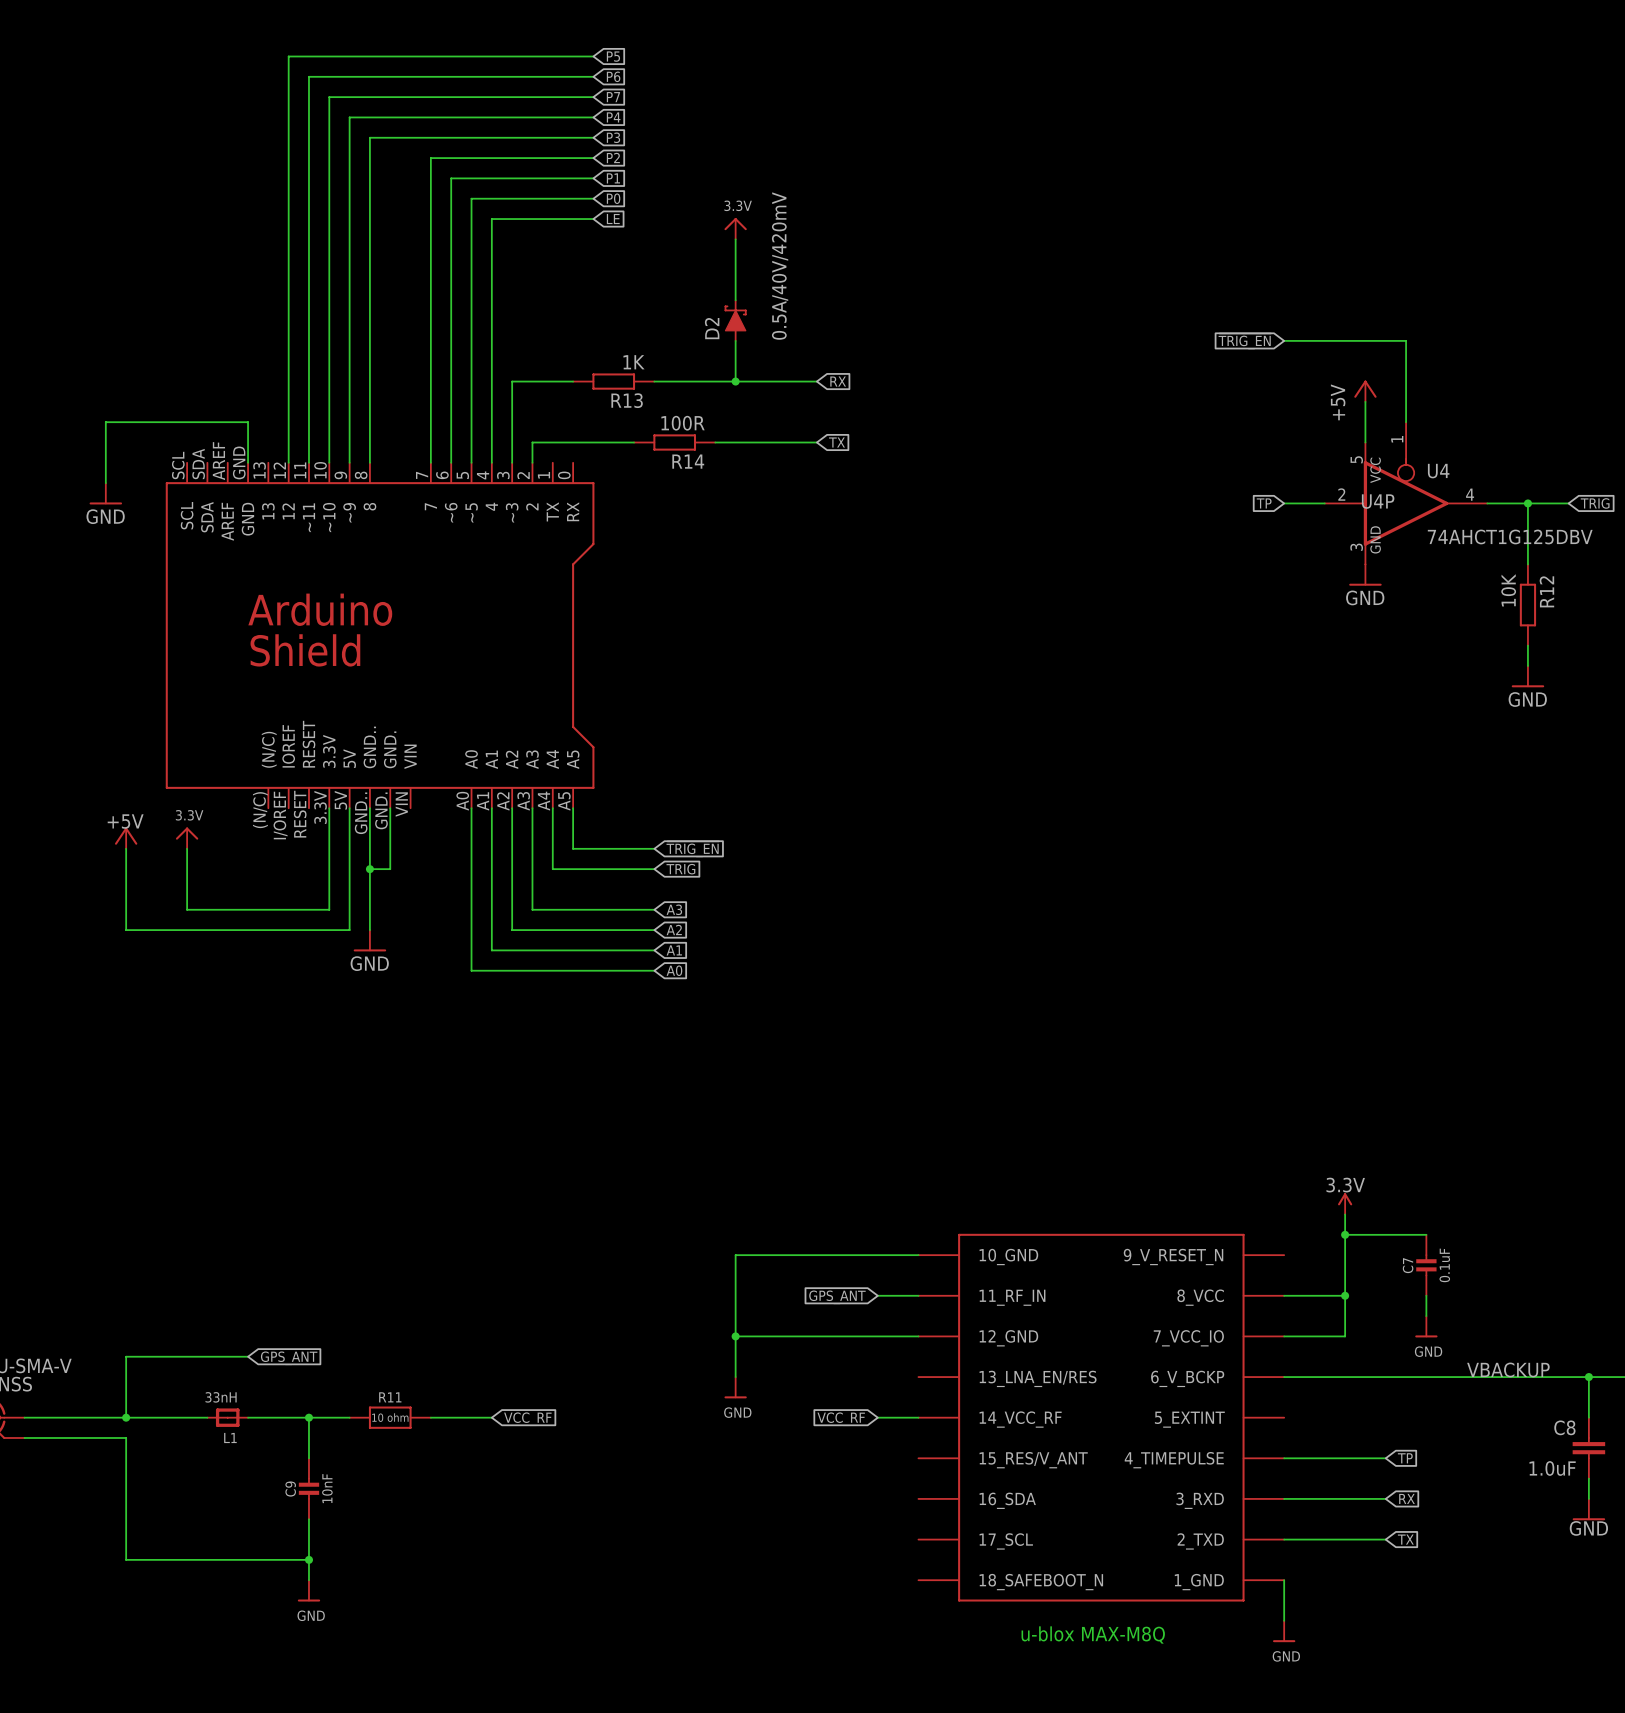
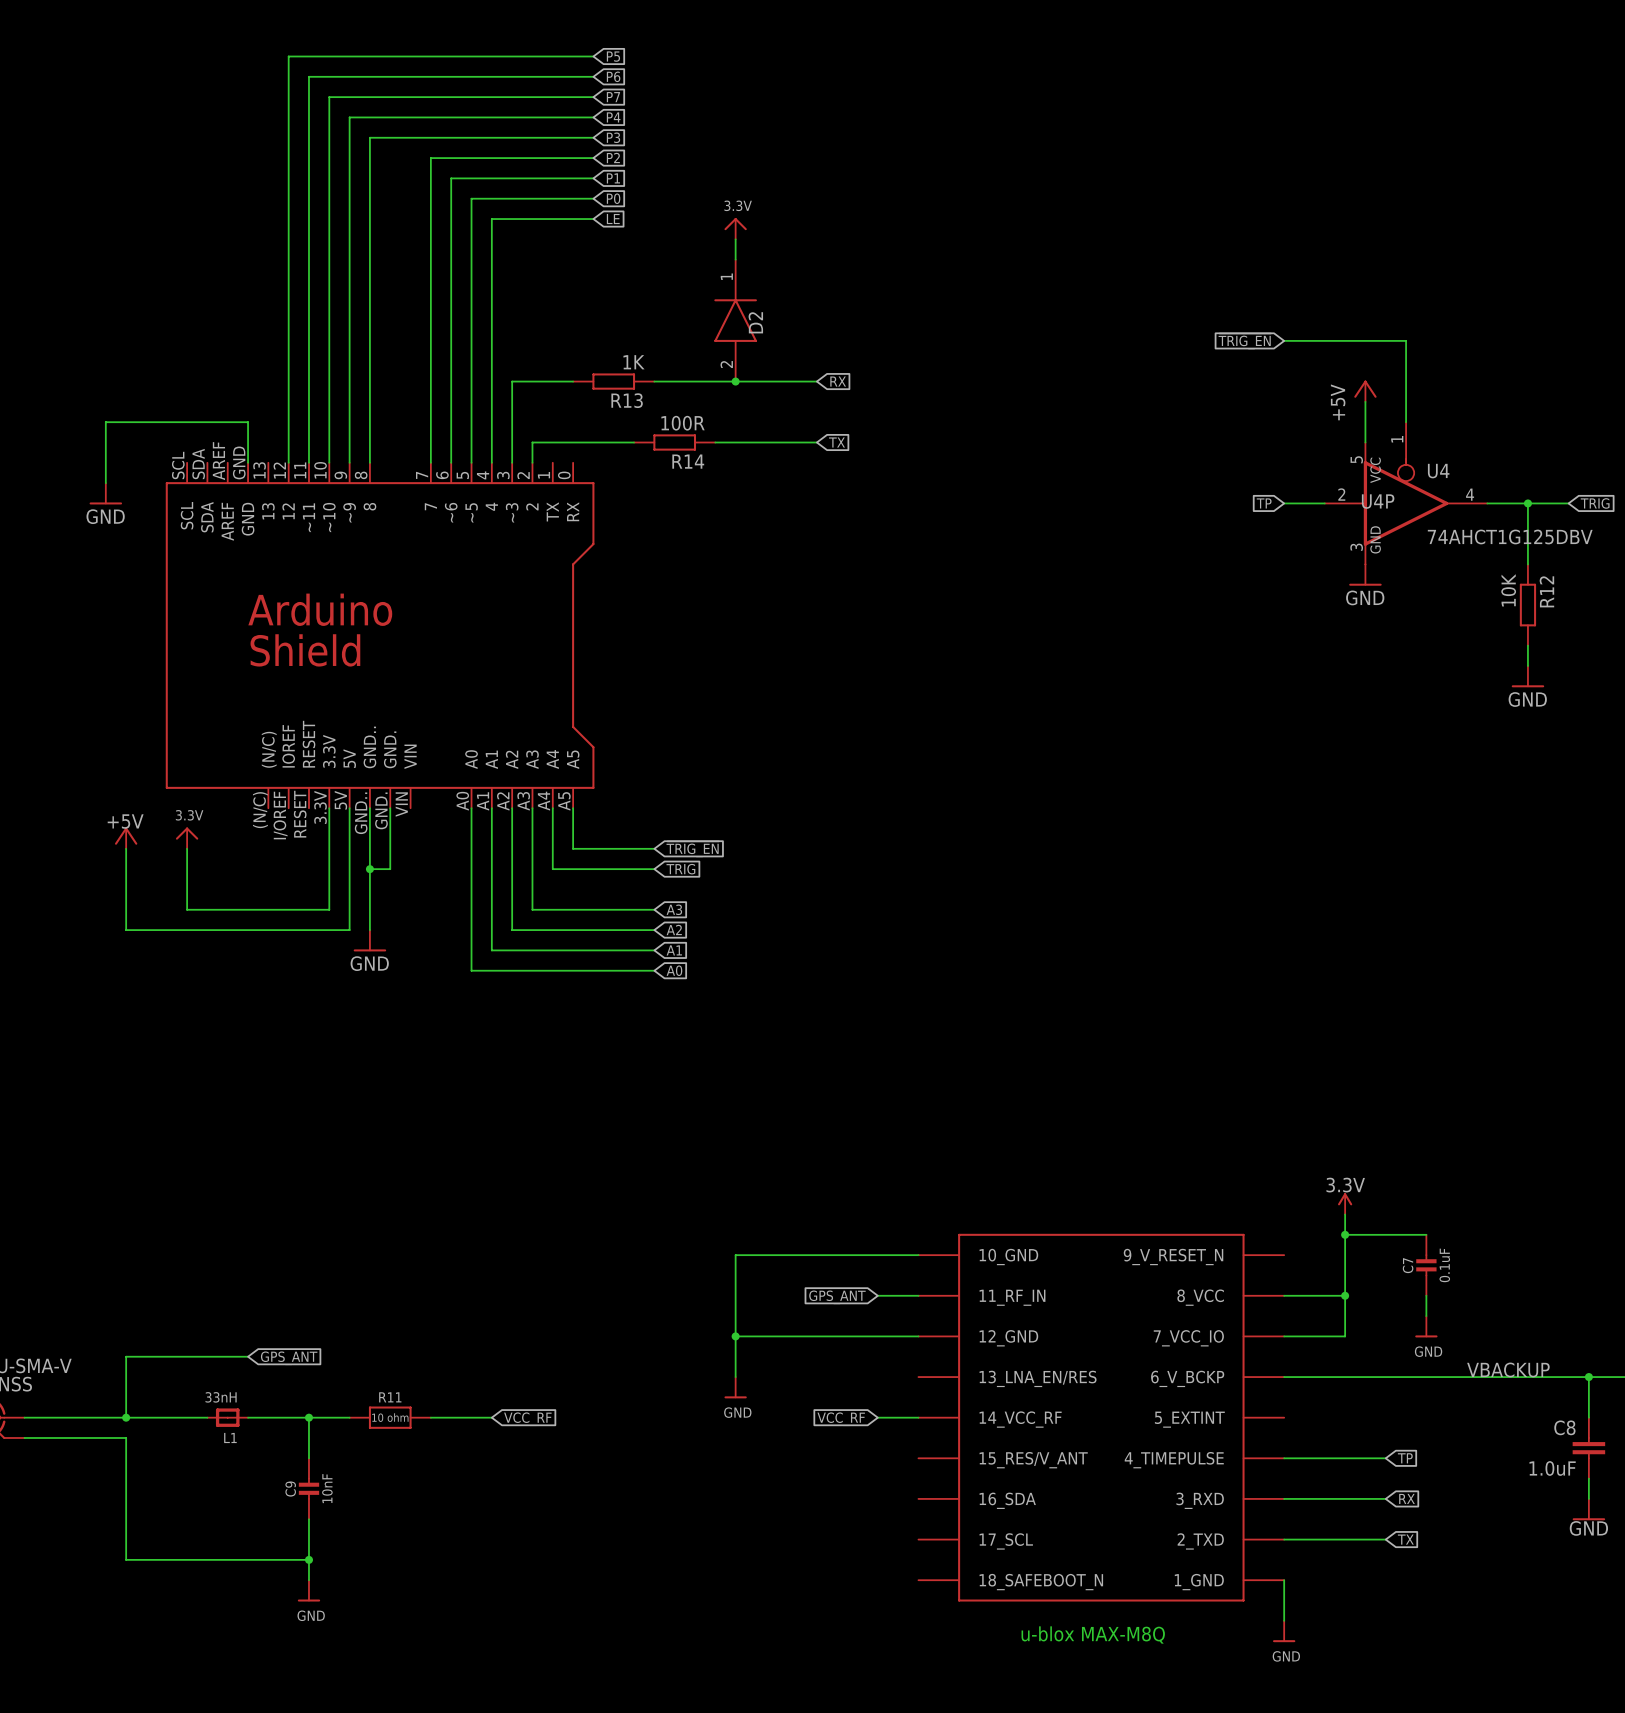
D2 value: 0.5A/40V/420mV (780, 266) -> none
D2 symbol: [724, 299, 747, 342] -> [714, 259, 757, 382]
D2 name position: D2 (712, 328) -> D2 (755, 322)

